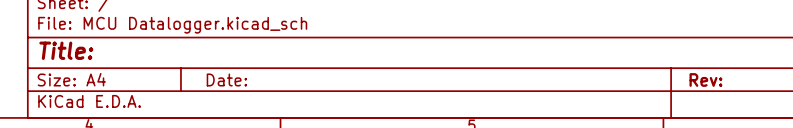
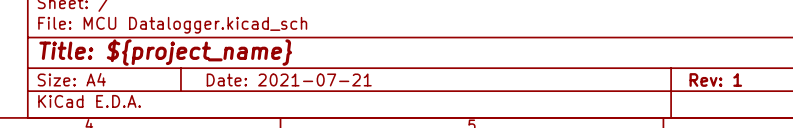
title block: Title: (66, 50) -> Title: ${project_name} (165, 52)
title block: Date: (226, 79) -> Date: 2021-07-21 (289, 79)
title block: Rev: (705, 79) -> Rev: 1 (715, 79)

